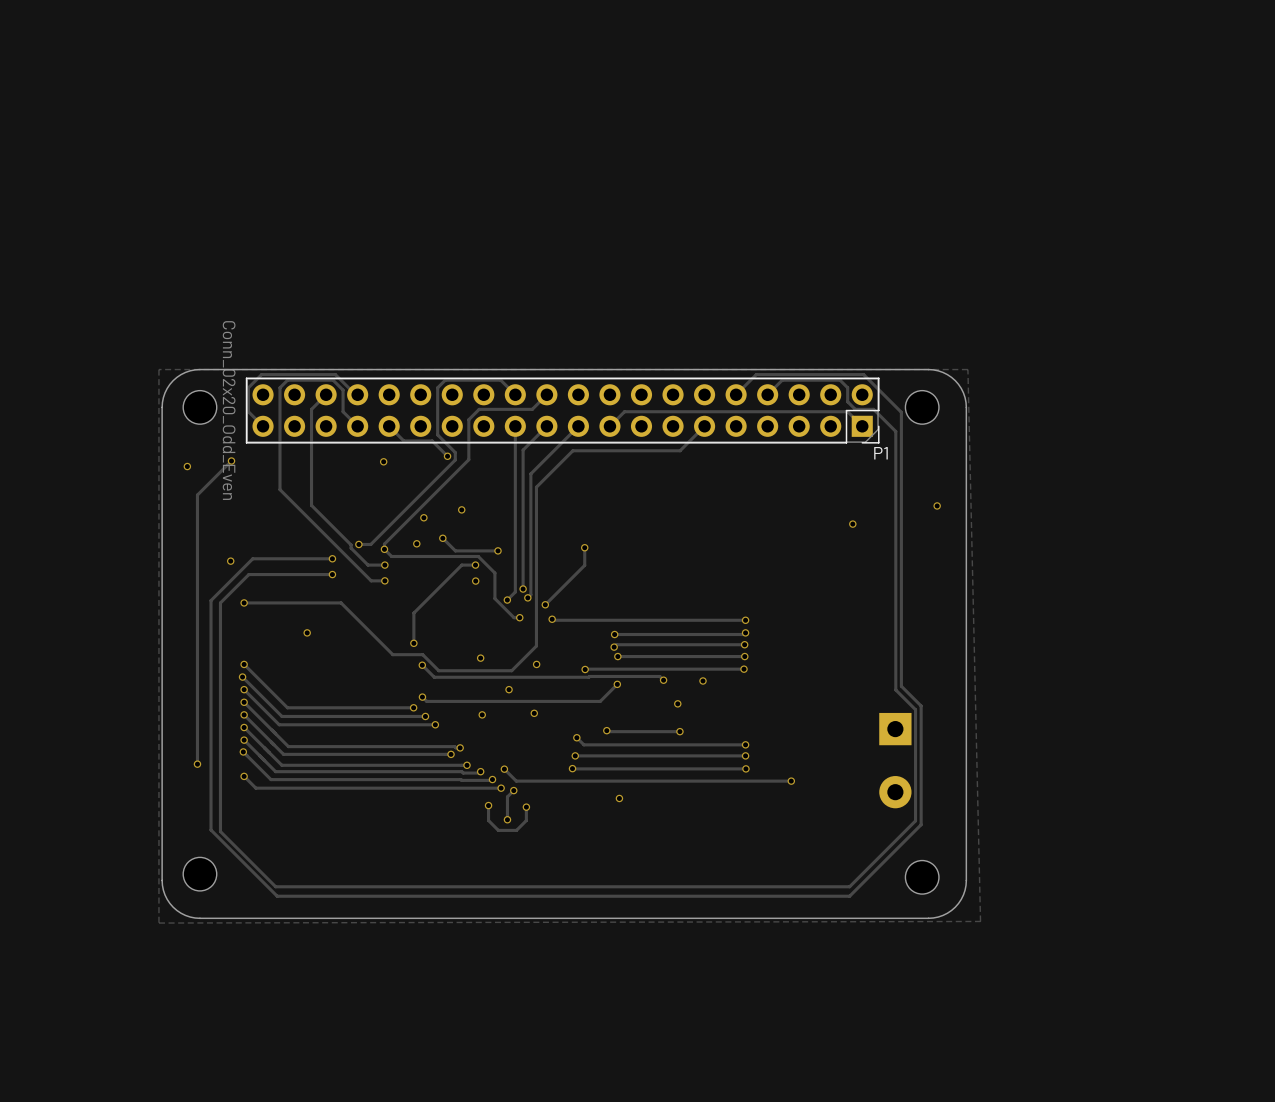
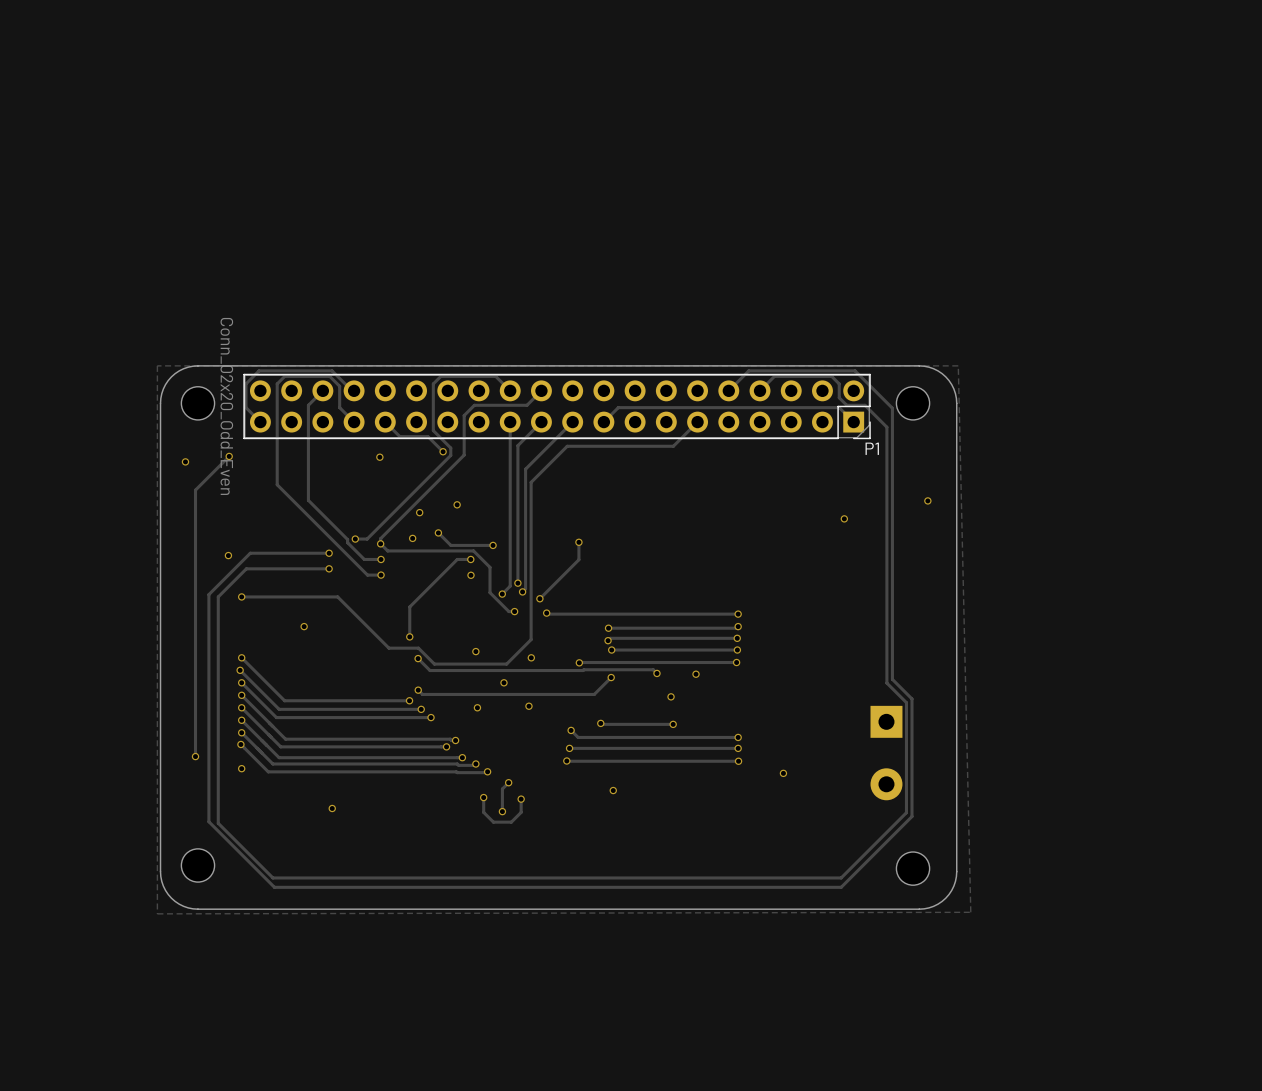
track: (504, 769) (516, 781) (791, 781) -> none
via: (504, 769) -> none
track: (244, 776) (255, 788) (501, 788) -> none
via: (501, 788) -> none
via: none -> (332, 808)

